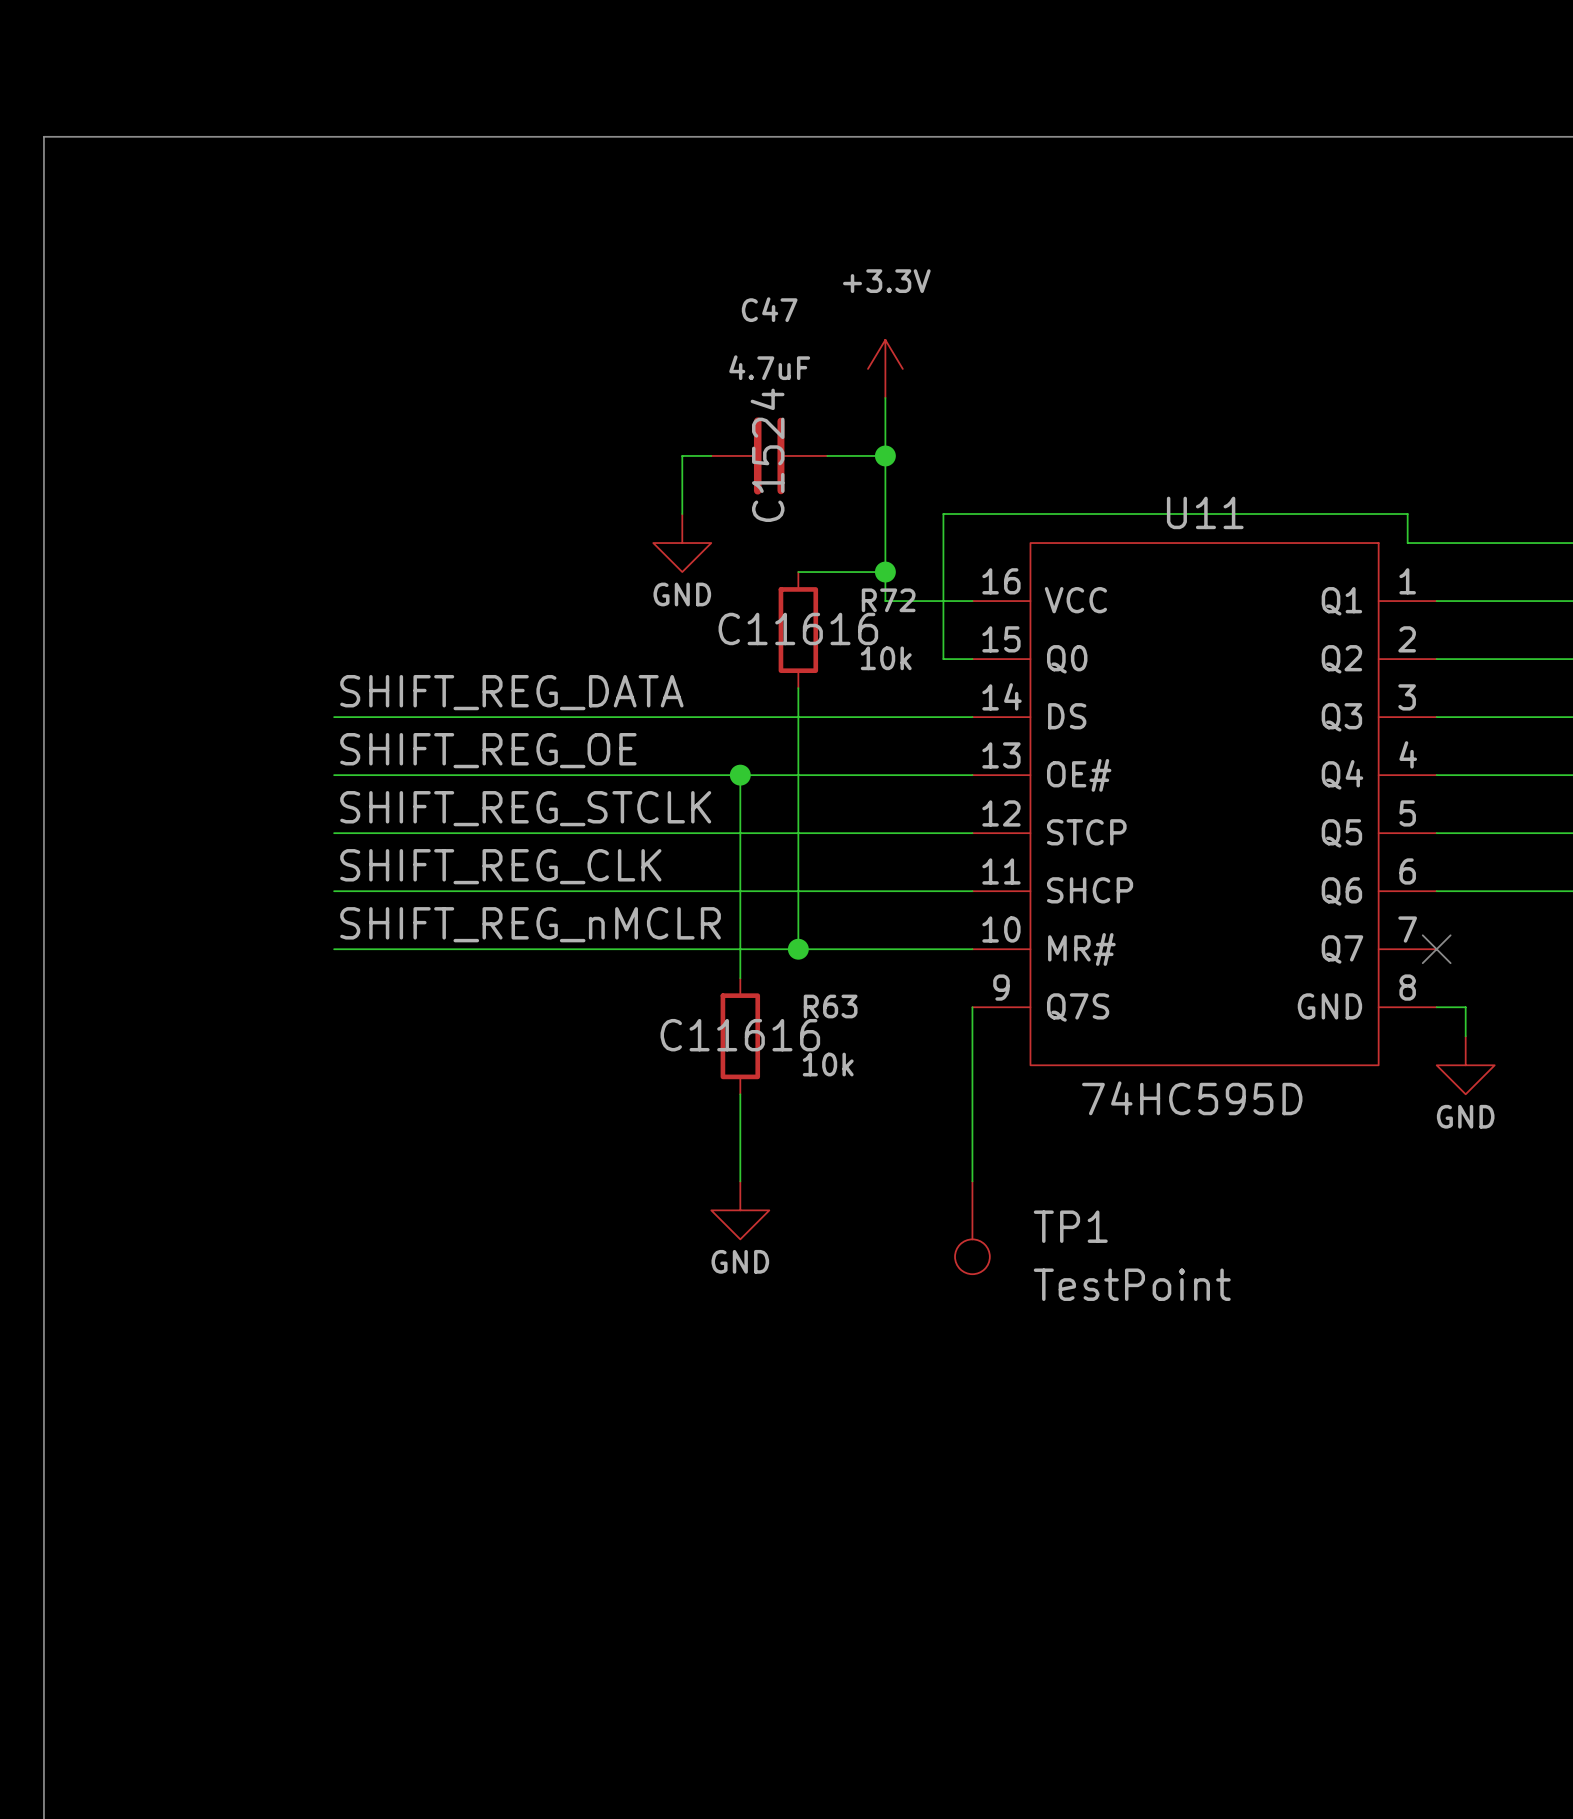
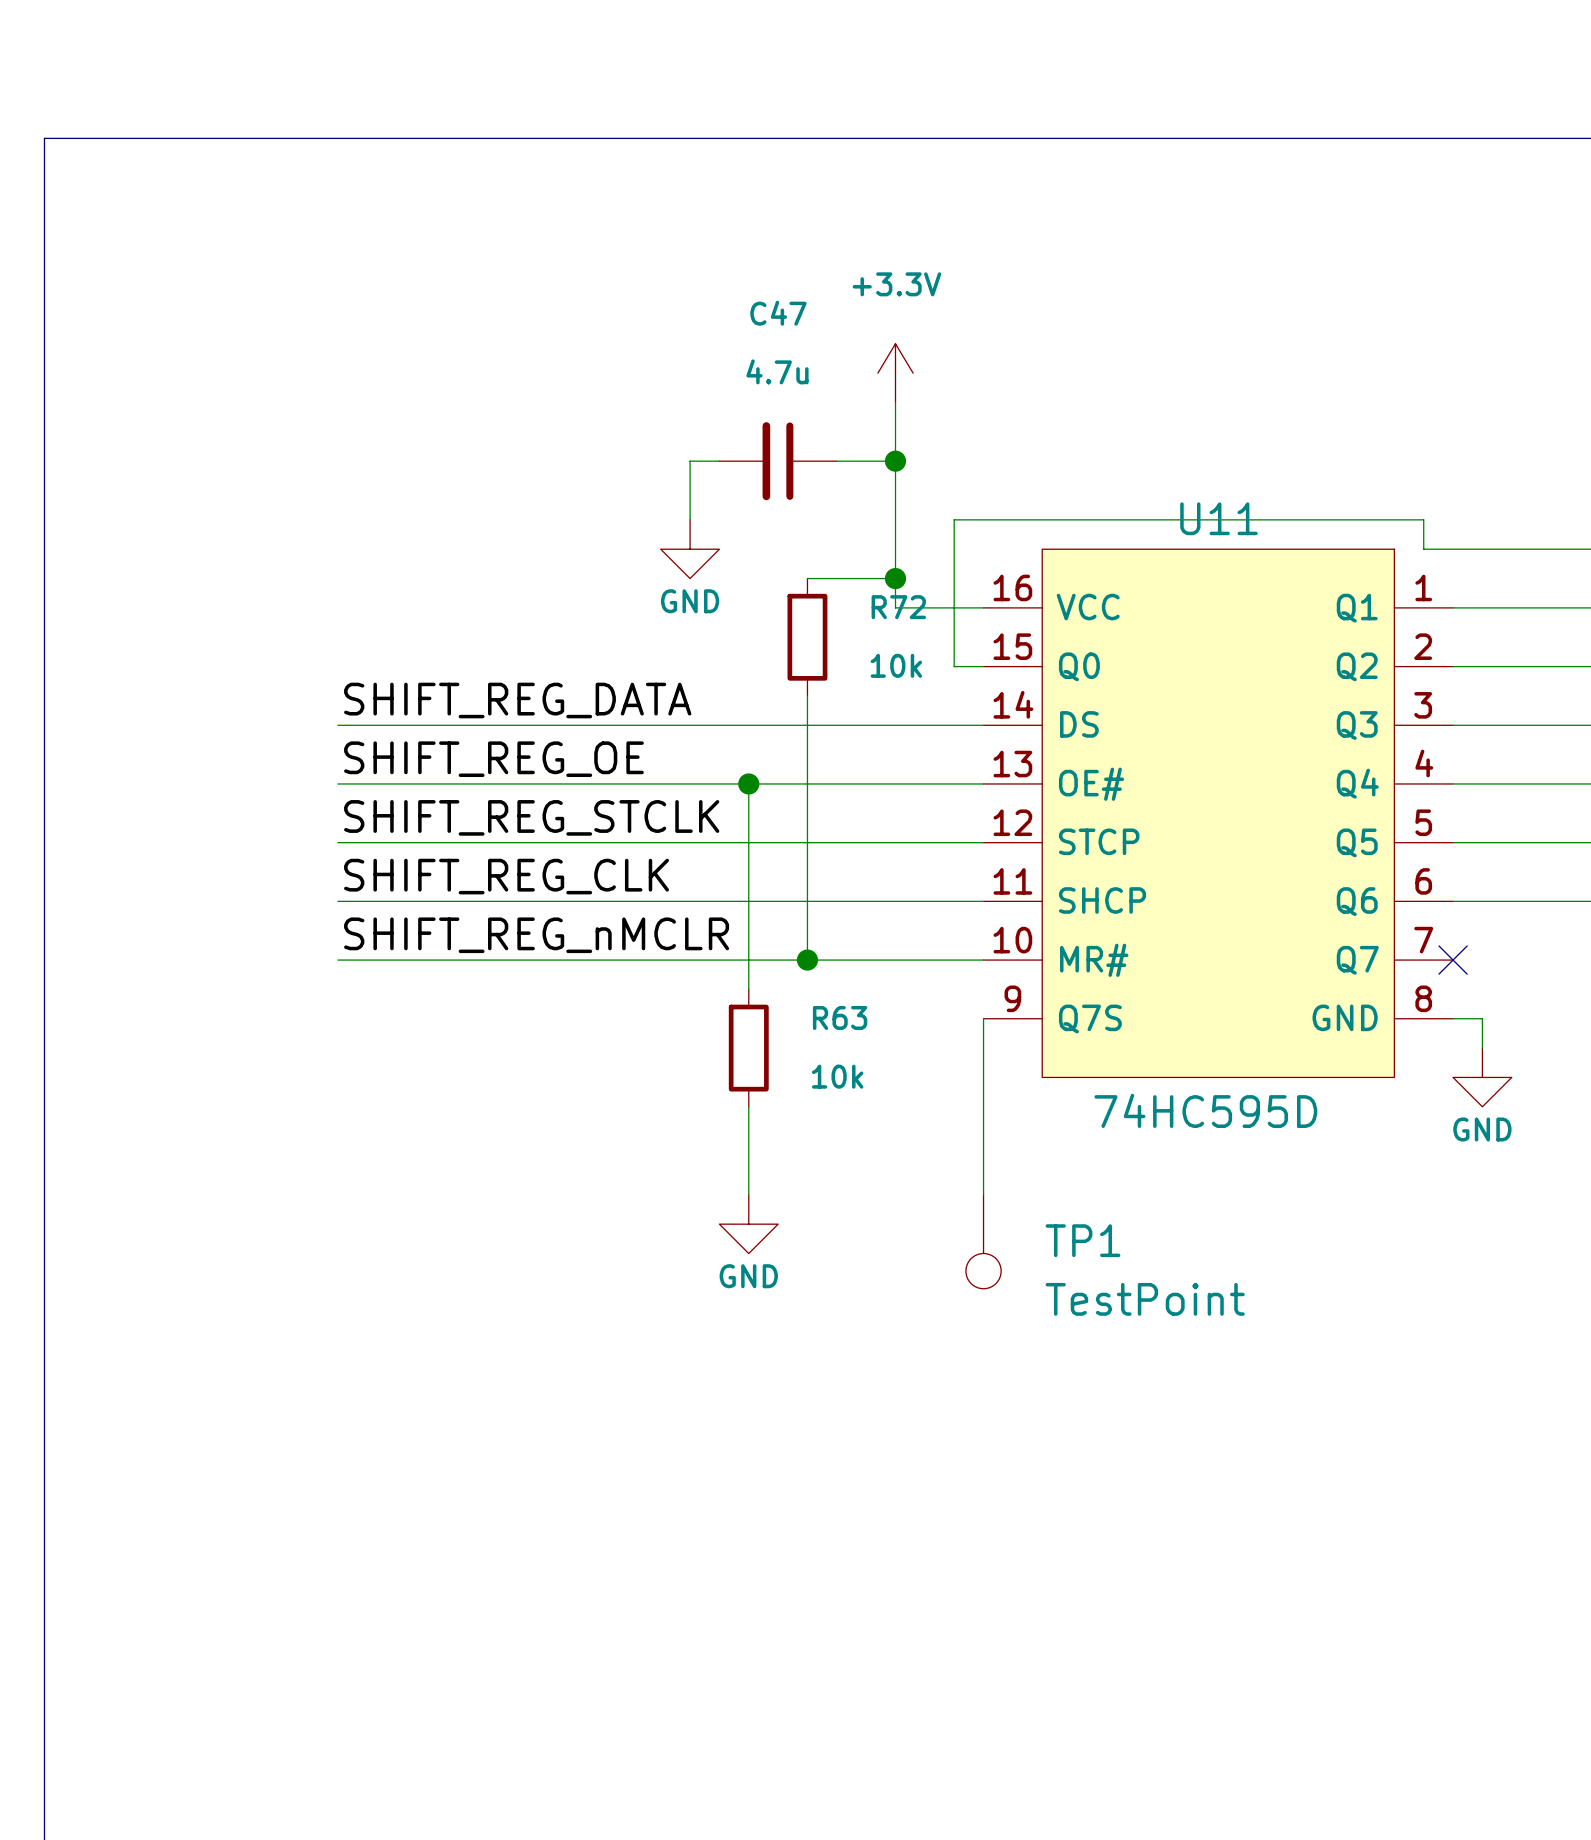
C47 value: 4.7uF (769, 367) -> 4.7u (777, 371)
C47 text: C1524 (767, 455) -> none
R72 text: C11616 (798, 628) -> none
R63 text: C11616 (740, 1035) -> none

